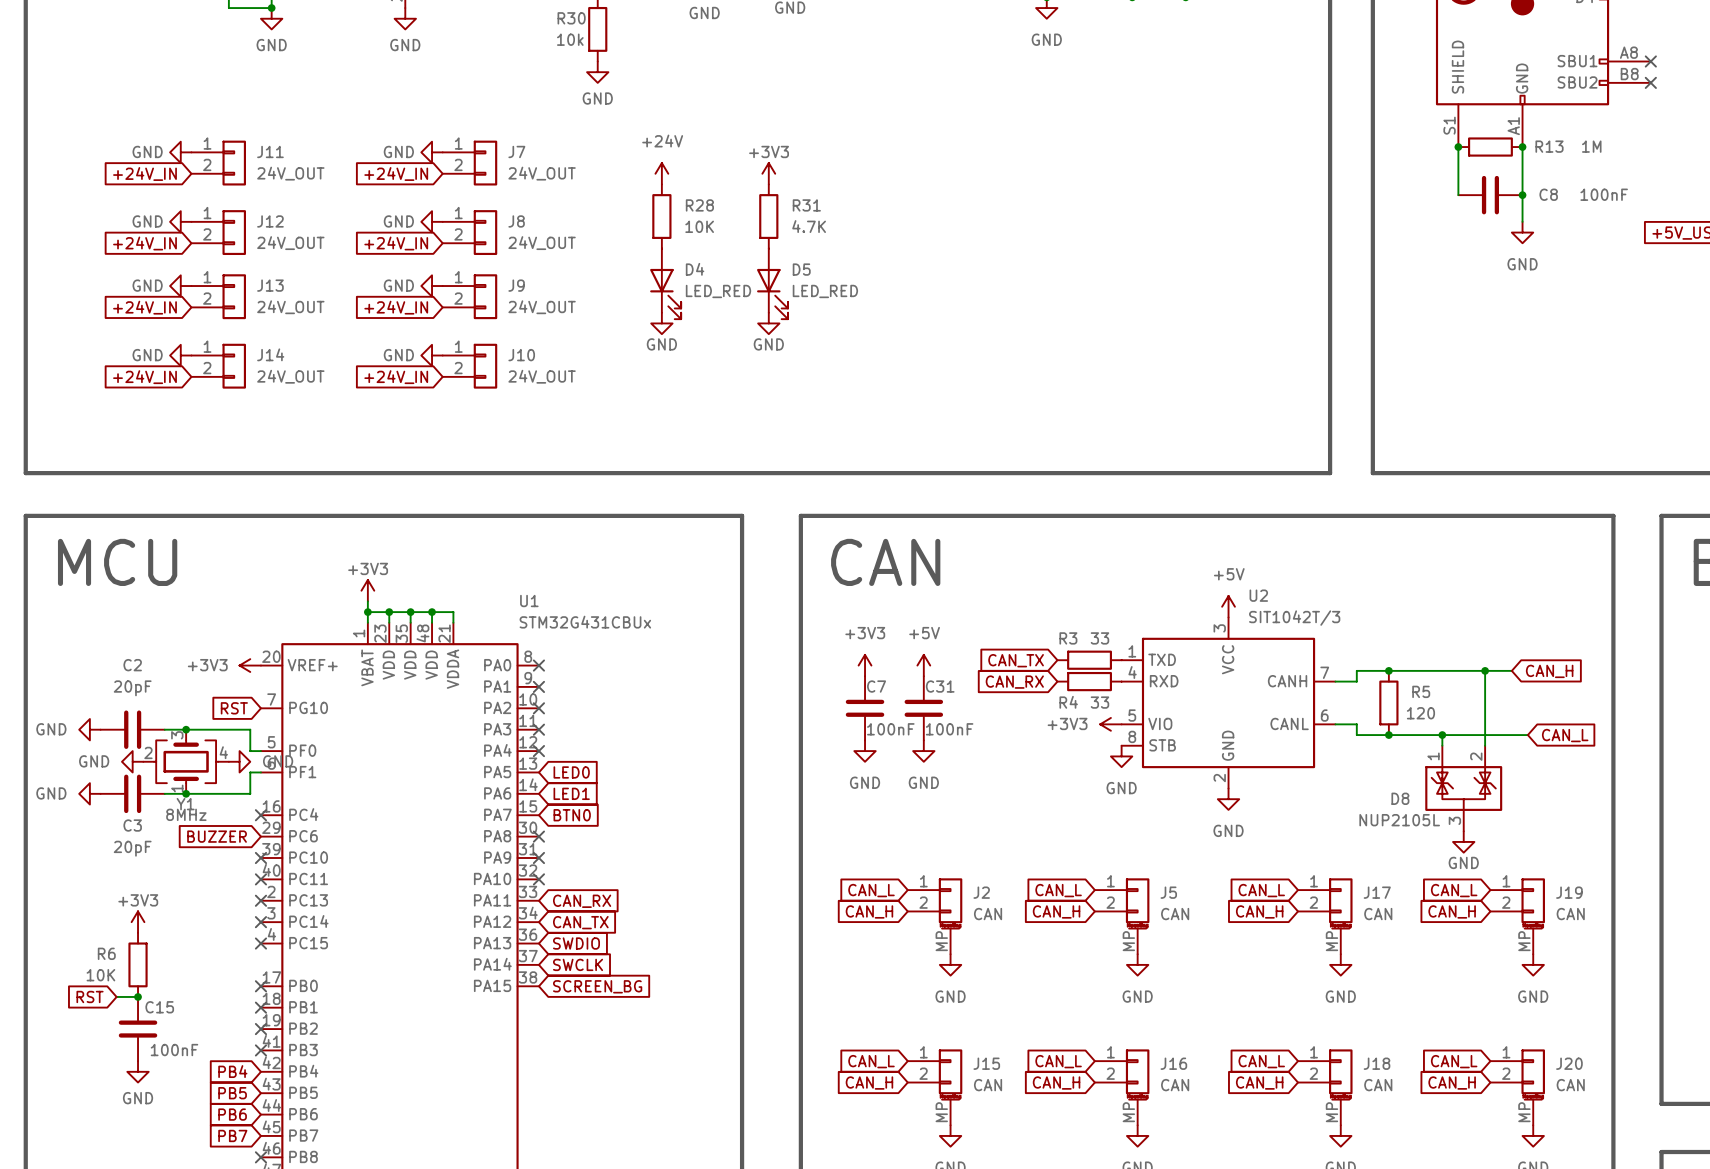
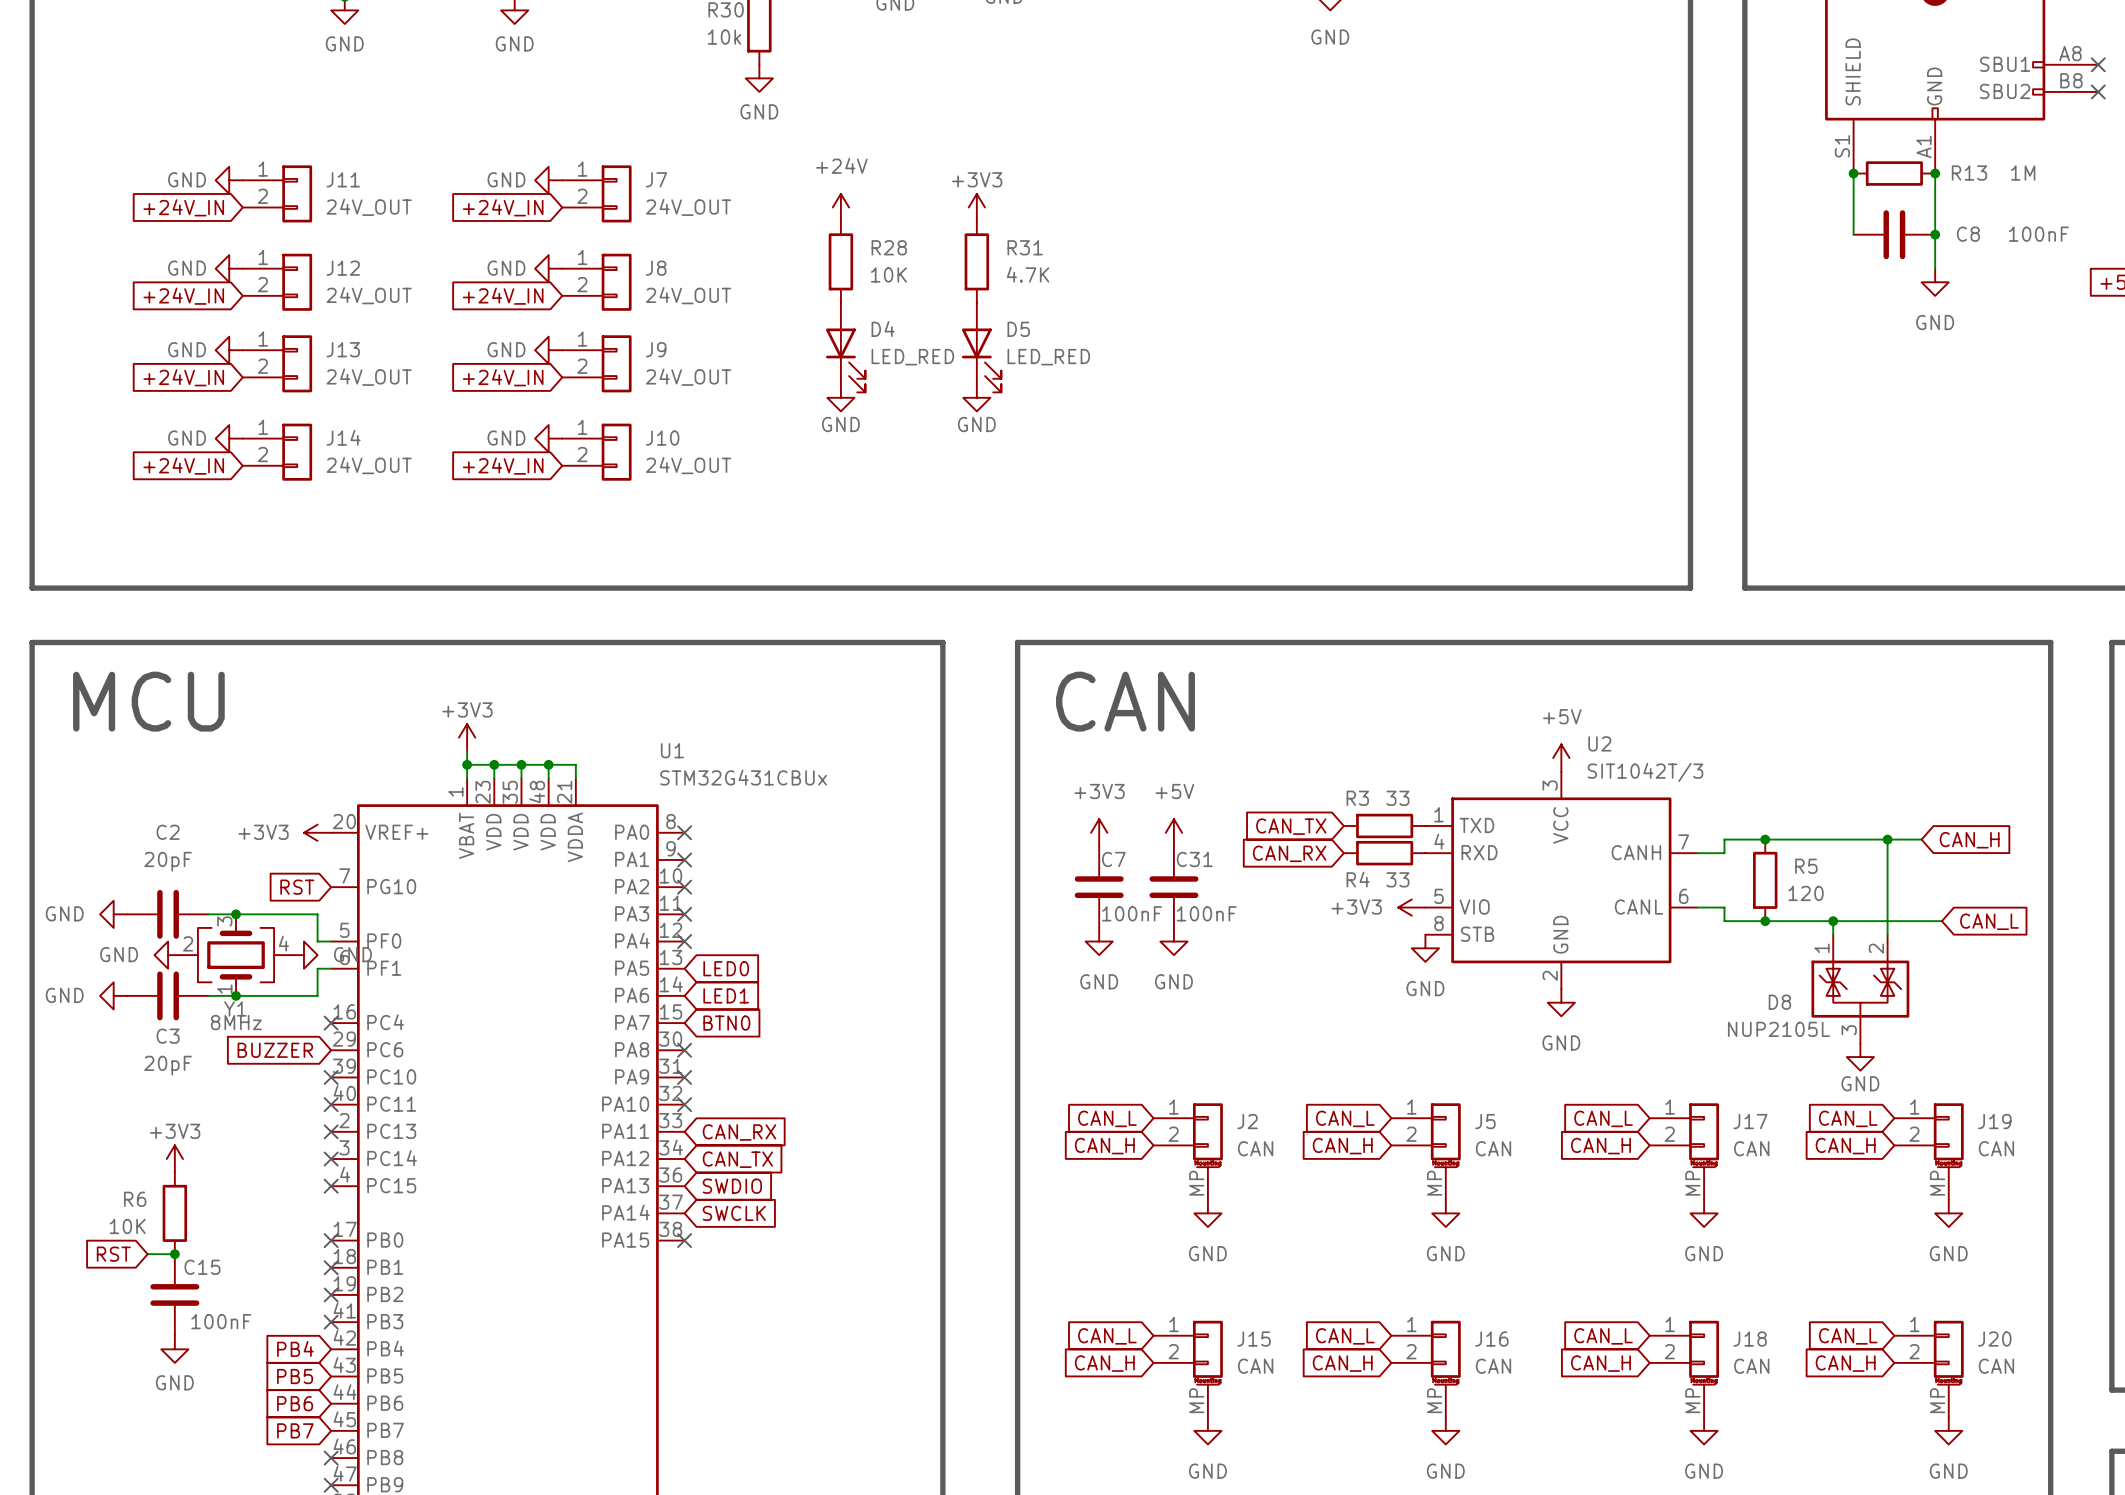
no-connect mark: none -> (684, 1240)
global label: SCREEN_BG (597, 986) -> none

